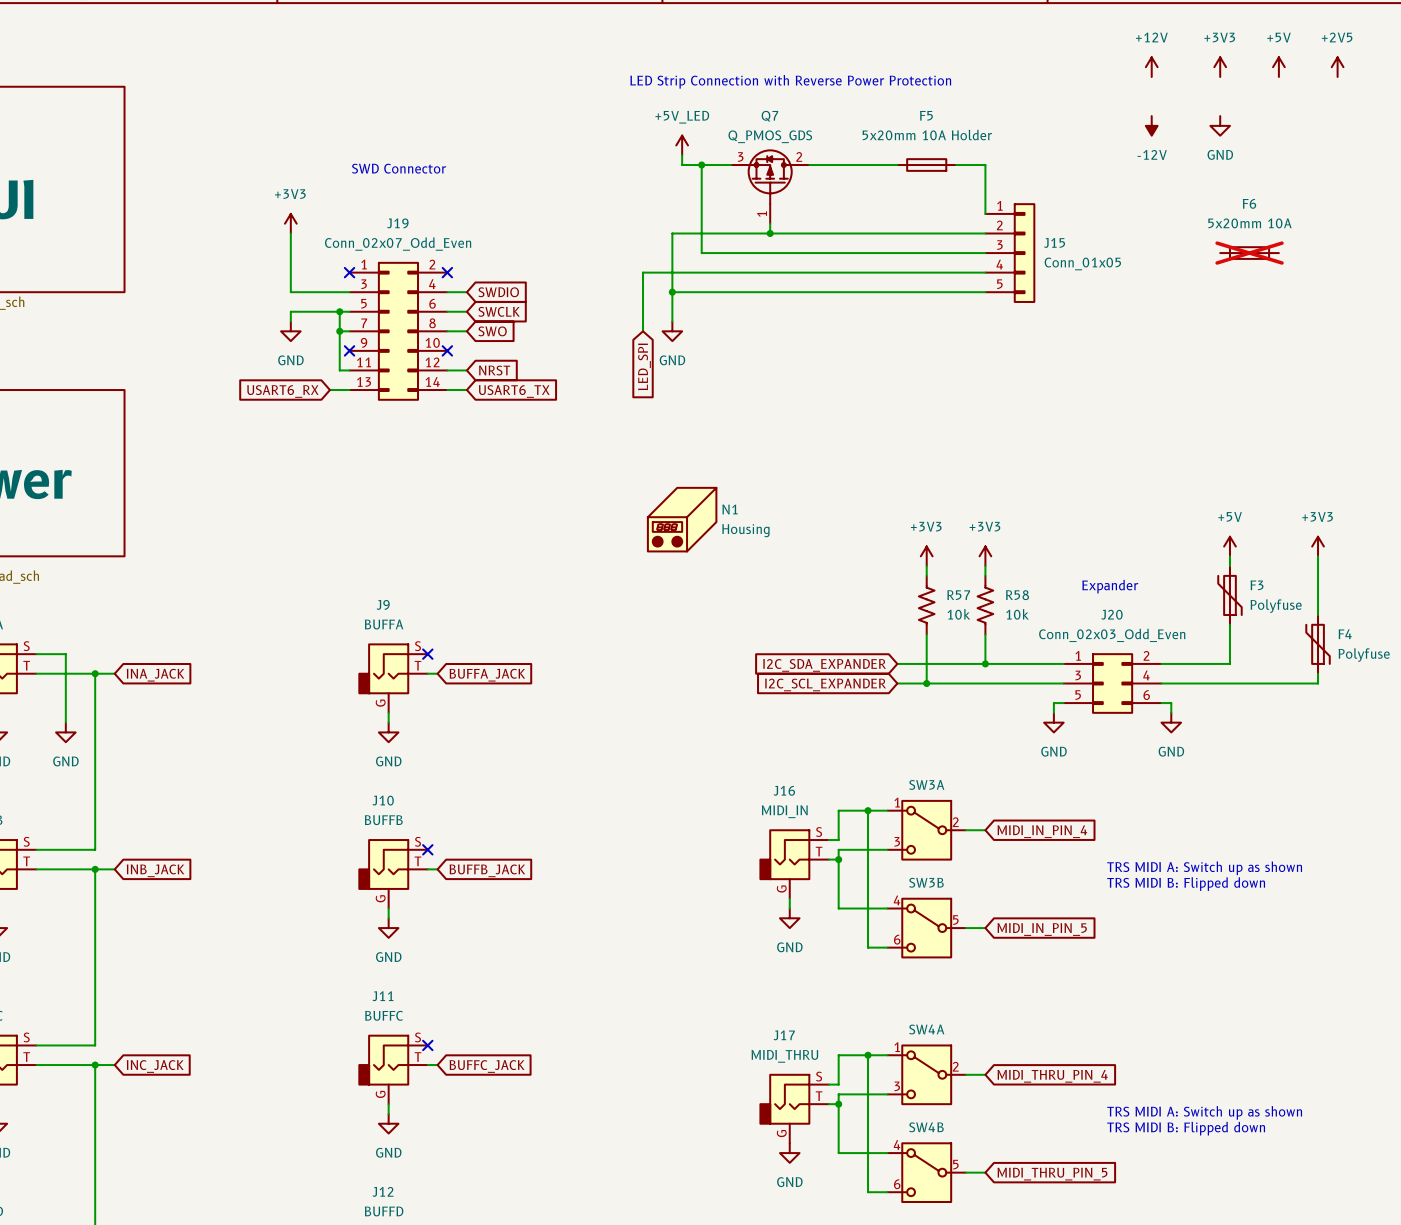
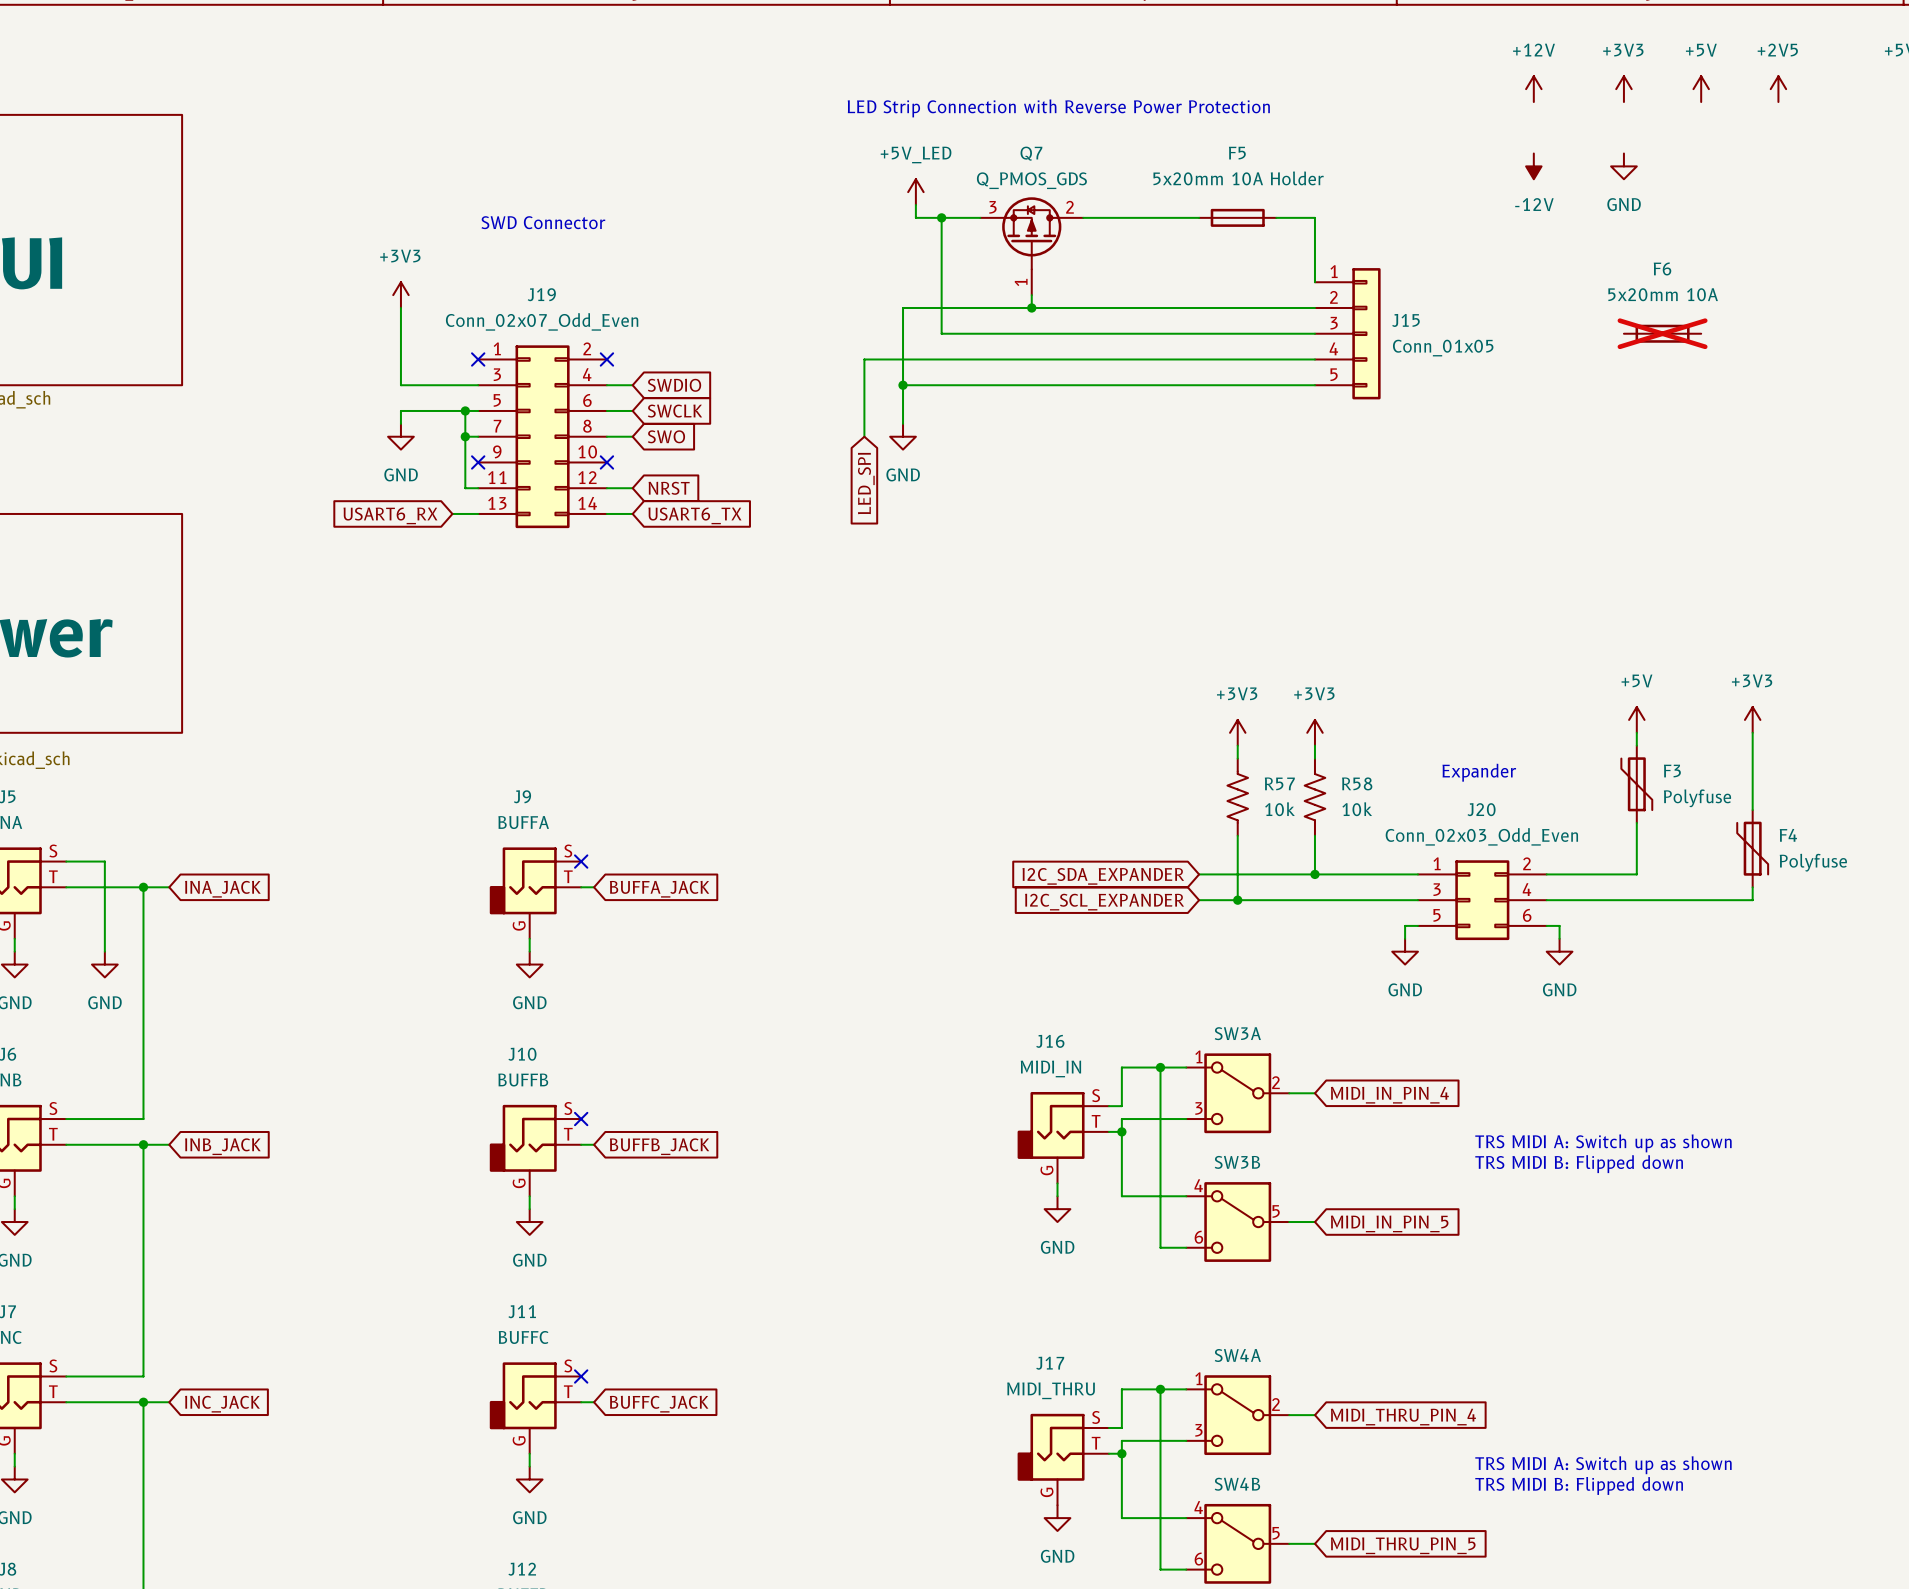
N1: Housing (682, 519) -> none

